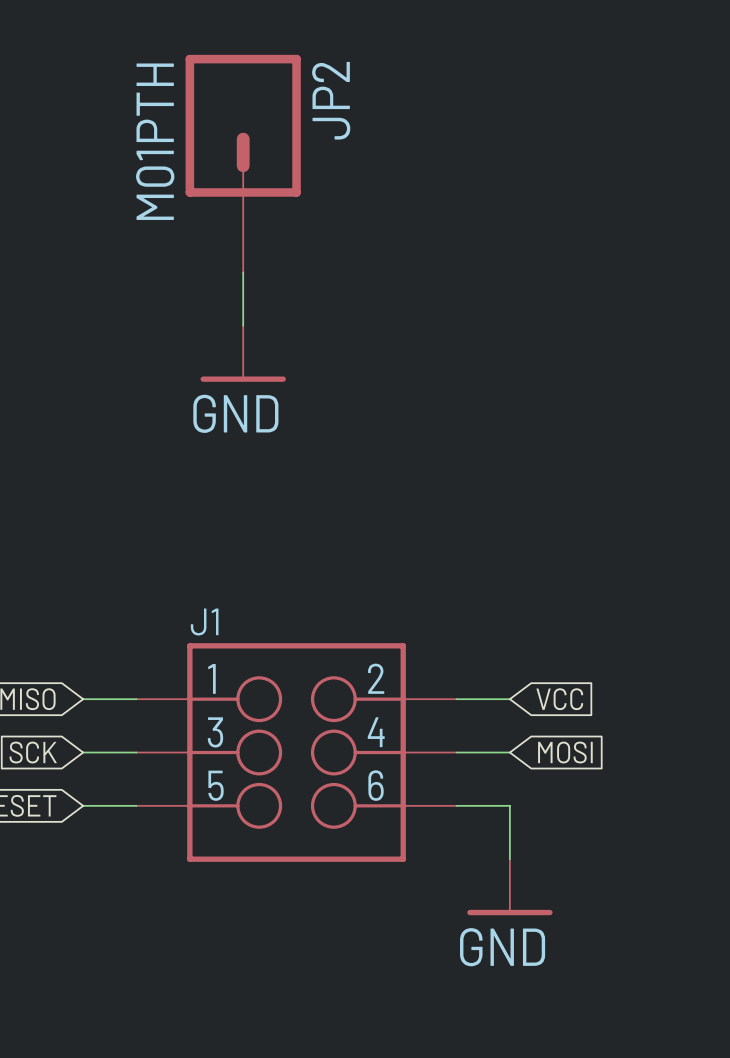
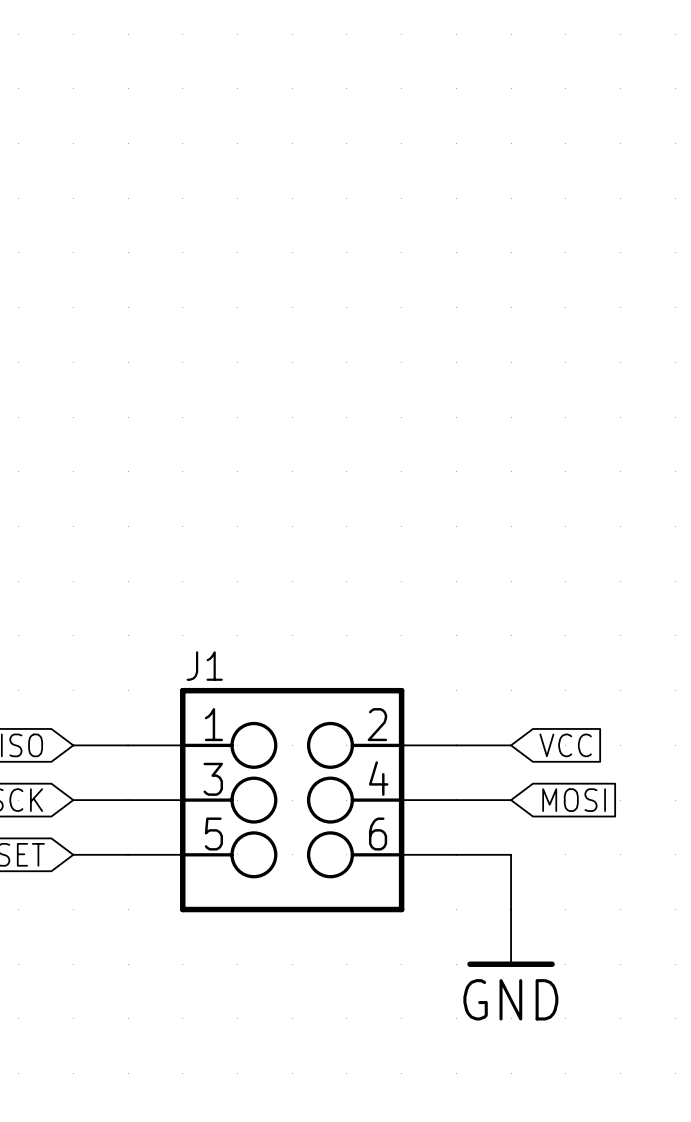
JP2: M01PTH (243, 163) -> none
wire: (243, 272) (243, 325) -> none
power symbol: GND (243, 353) -> none

